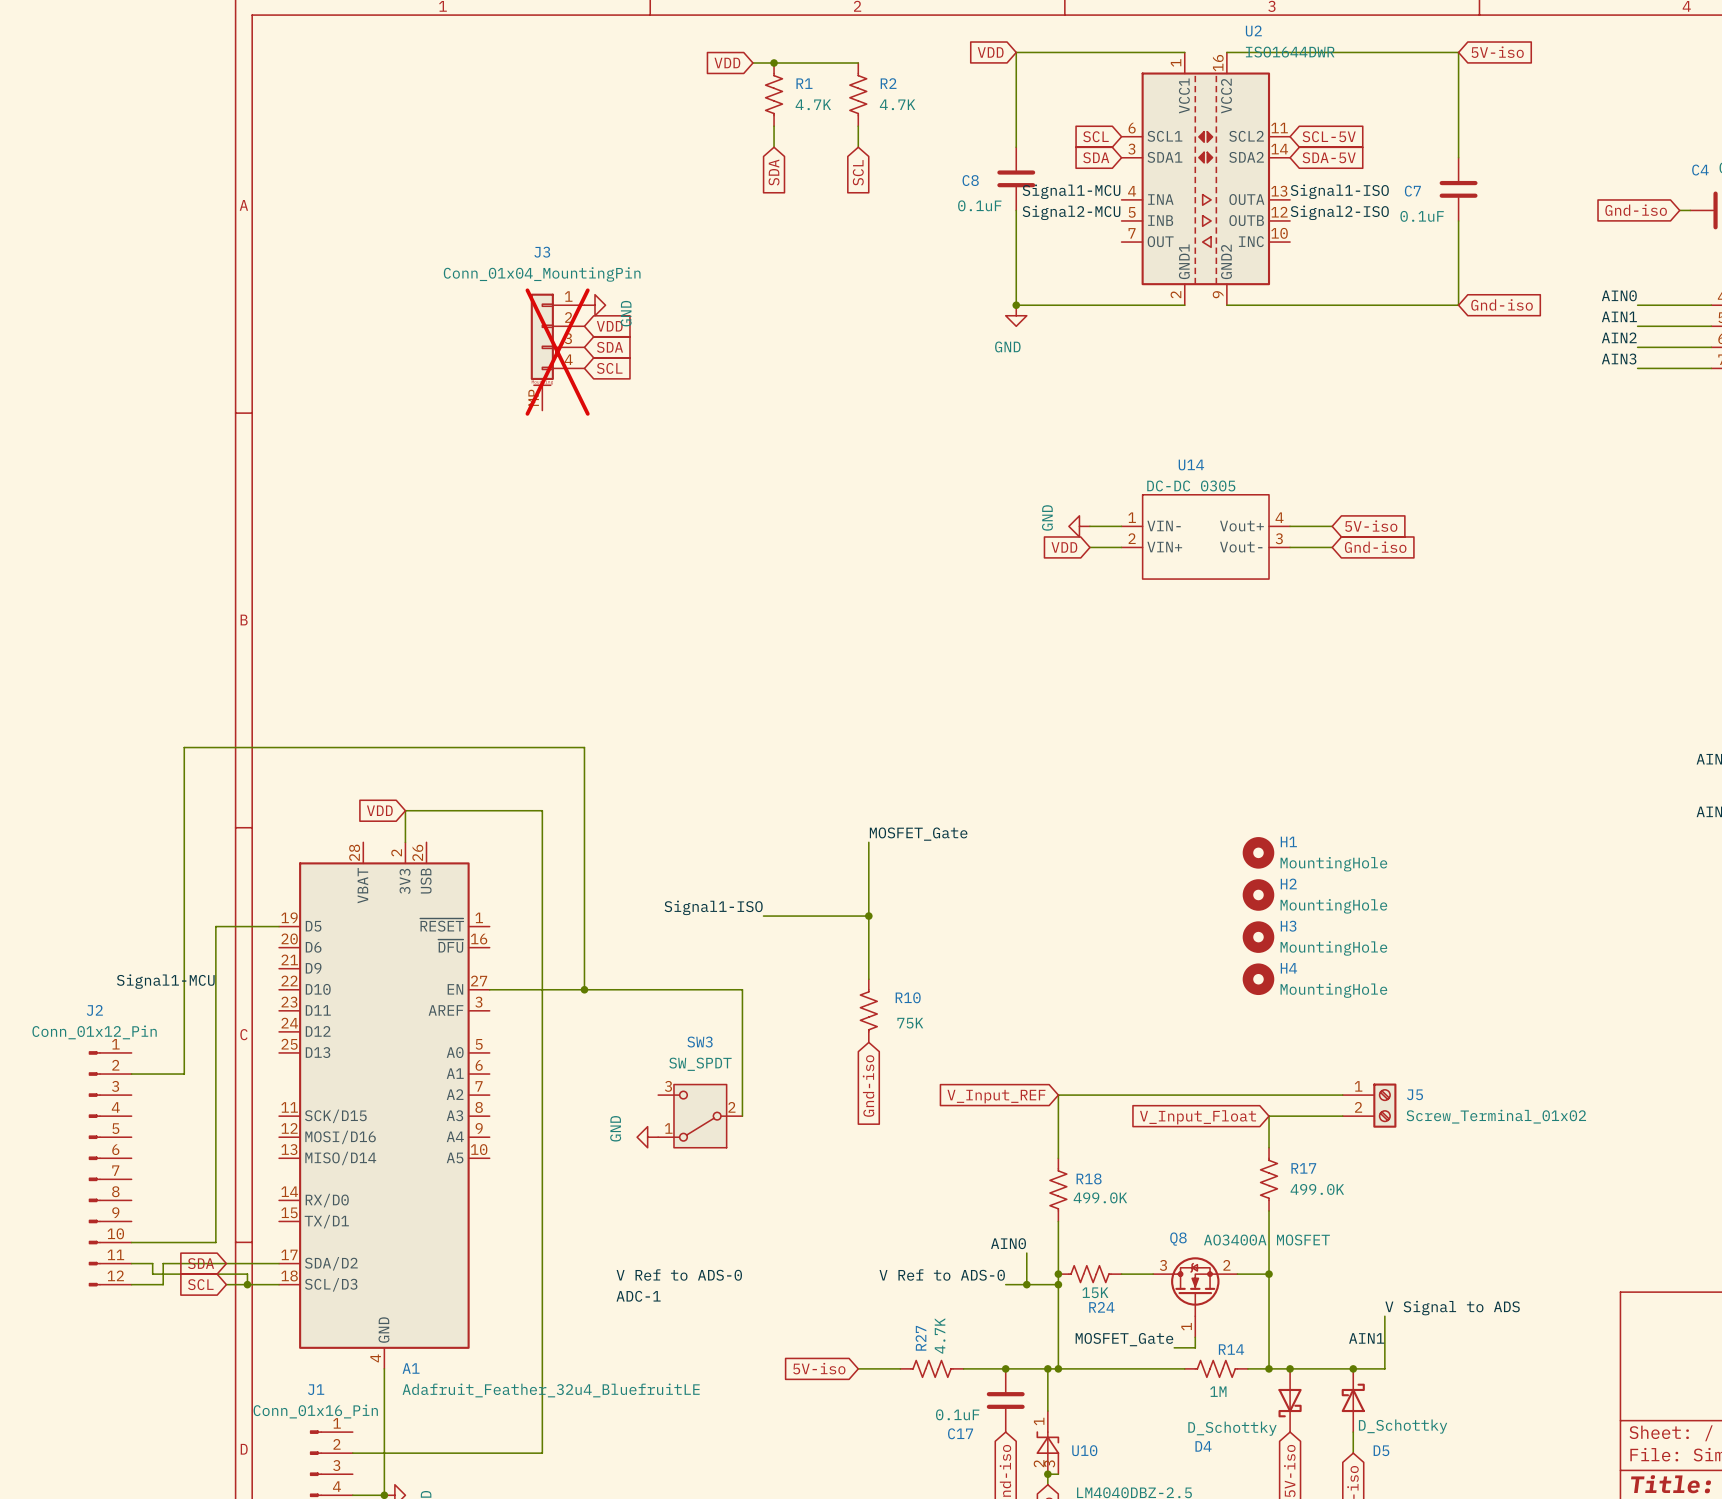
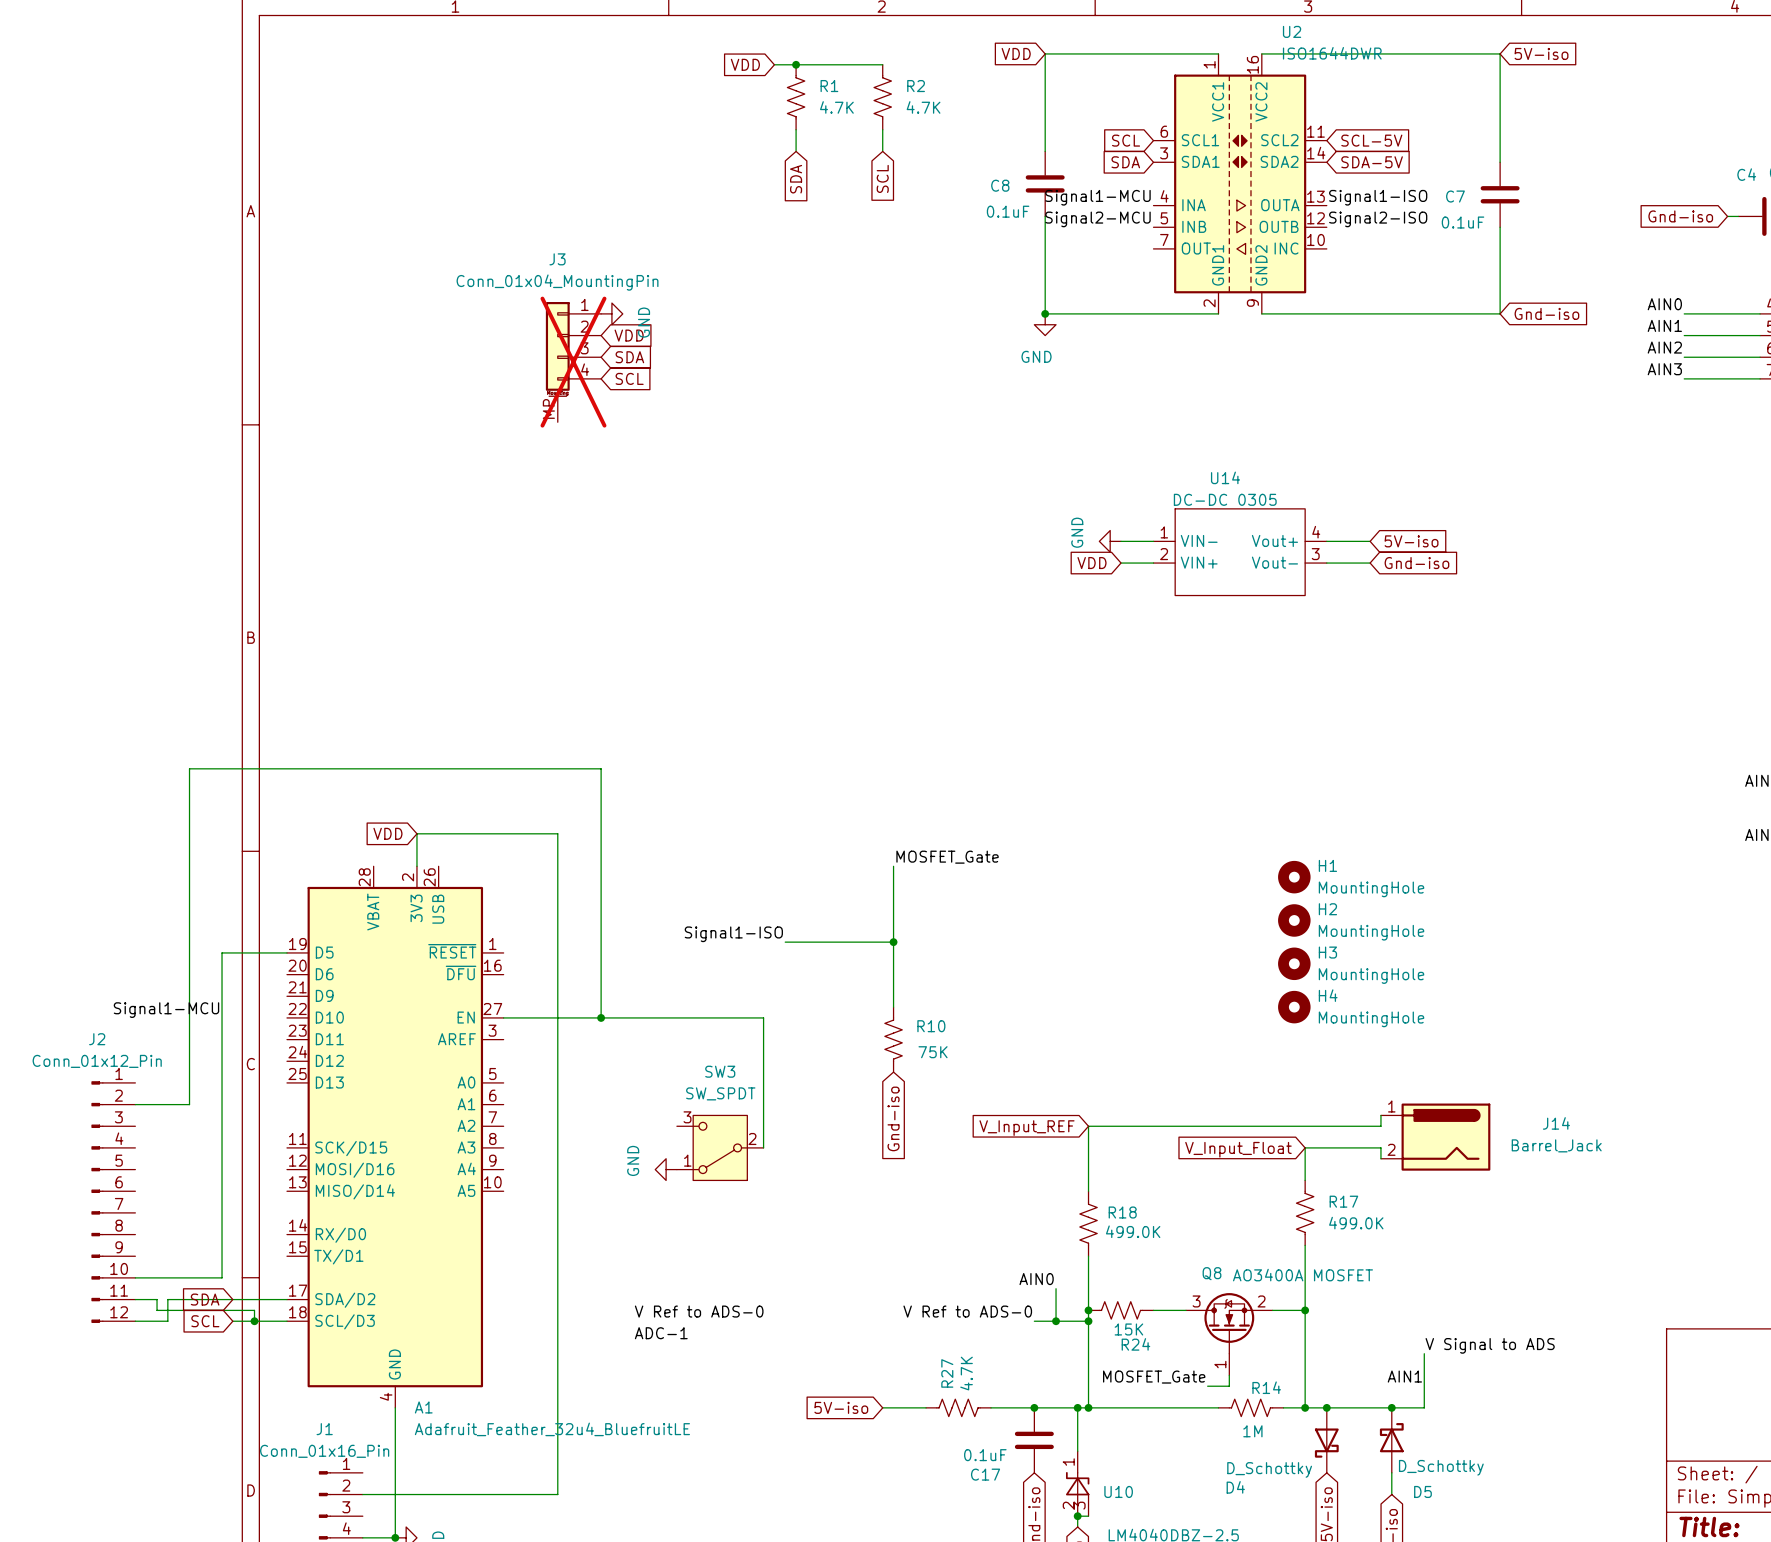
wire: none -> (1380, 1115) (1380, 1126)
J5: Screw_Terminal_01x02 (1369, 1105) -> none
J14: none -> Barrel_Jack (1435, 1137)
wire: none -> (1380, 1147) (1380, 1158)

